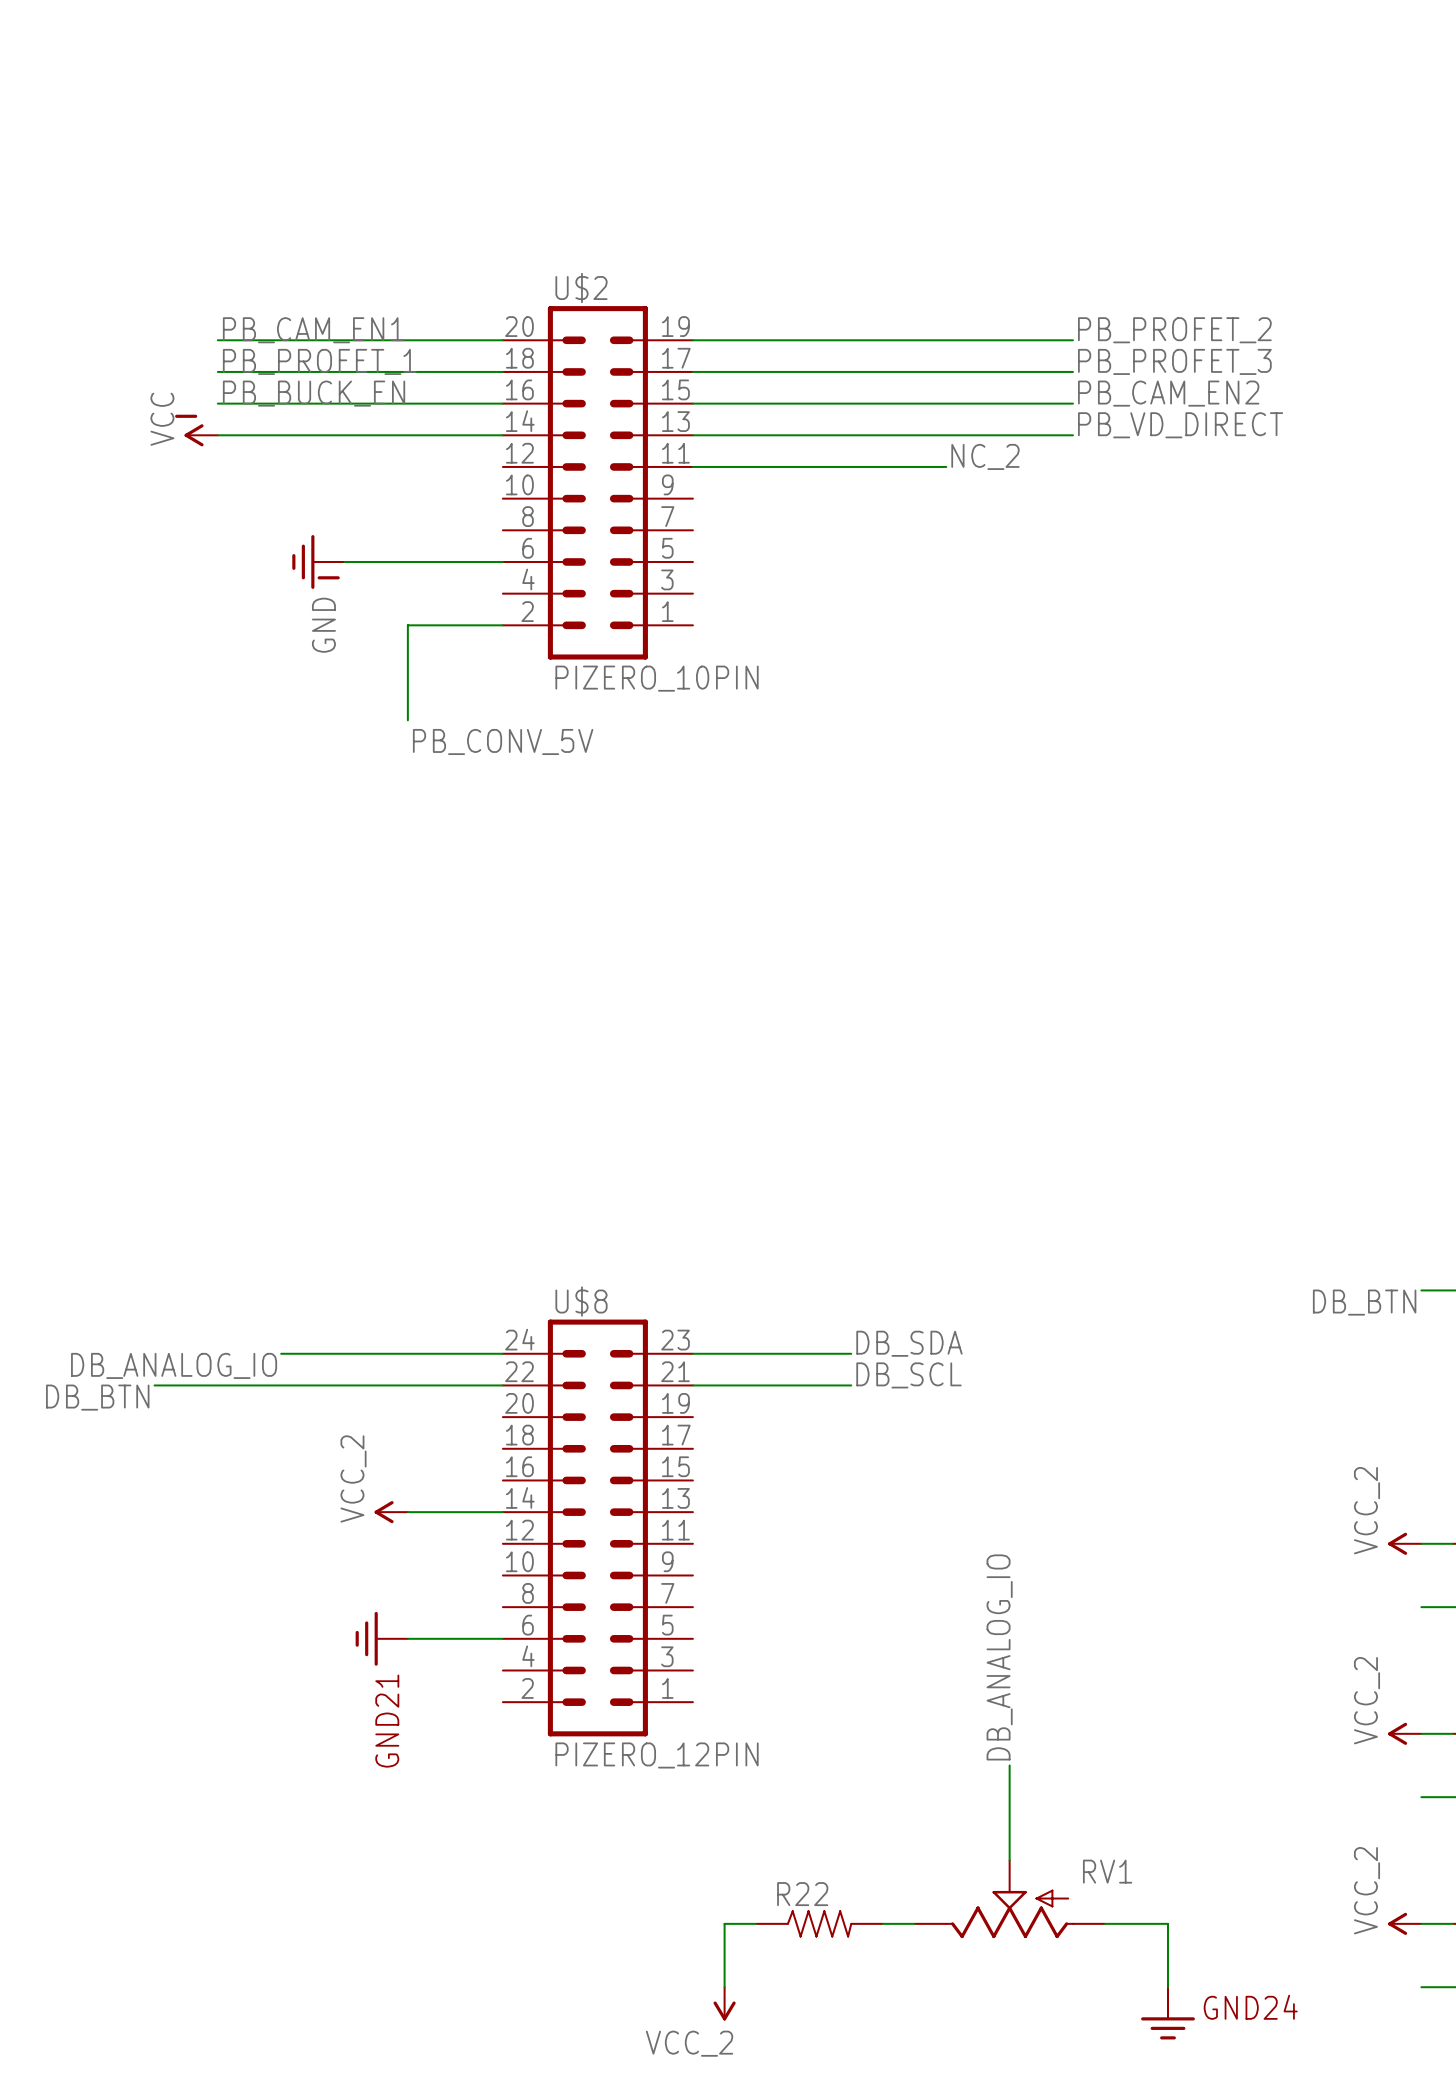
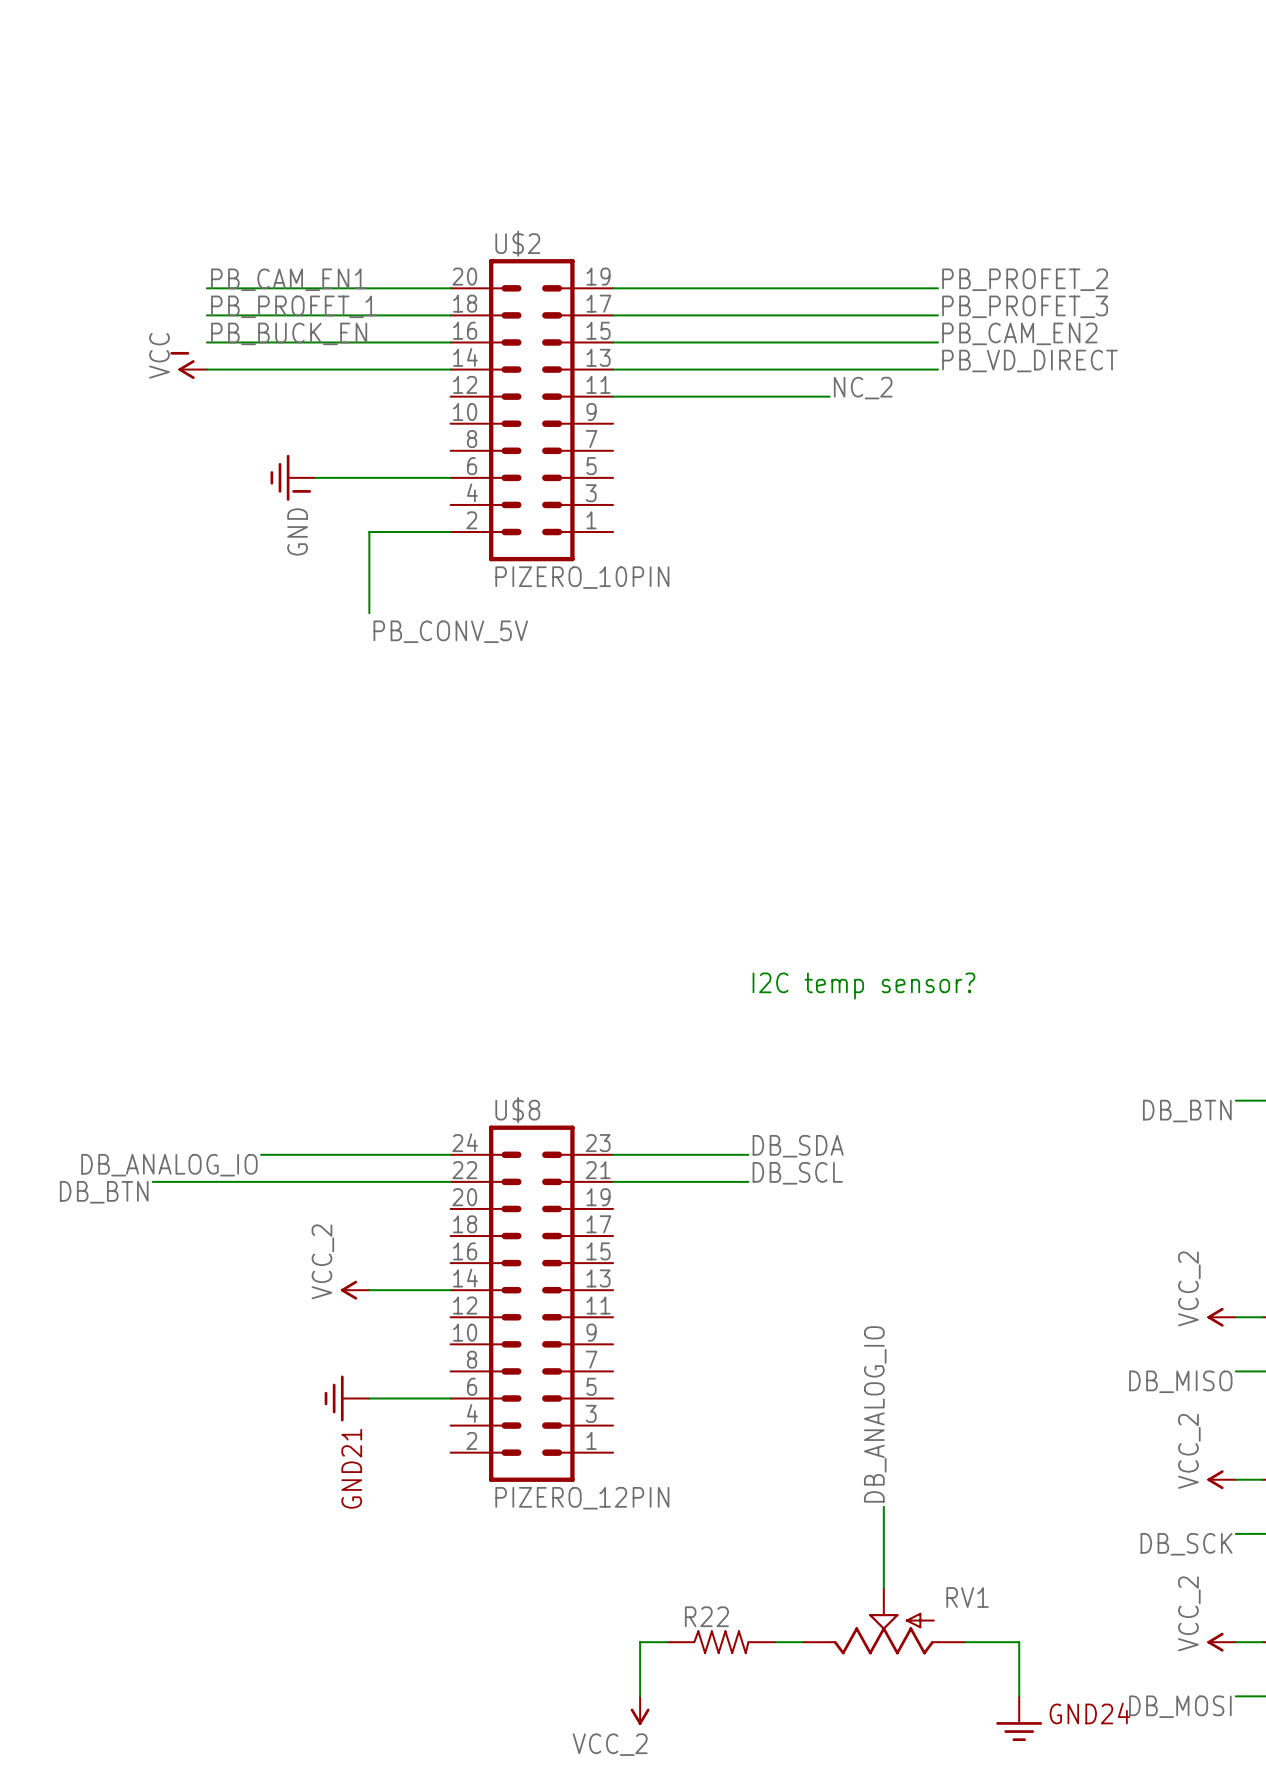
text: none -> I2C temp sensor? (863, 986)
label: none -> DB_MISO (1180, 1381)
label: none -> DB_SCK (1186, 1544)
label: none -> DB_MOSI (1180, 1706)

